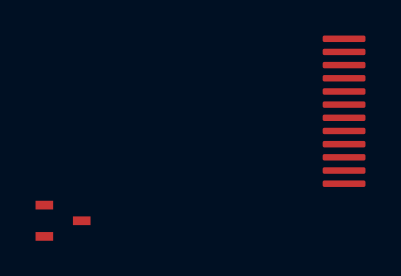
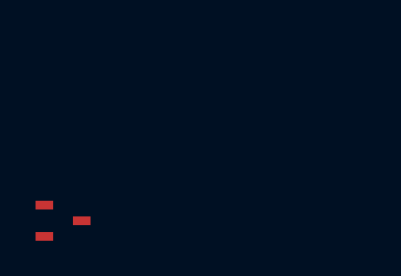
part: (344, 111) -> none

